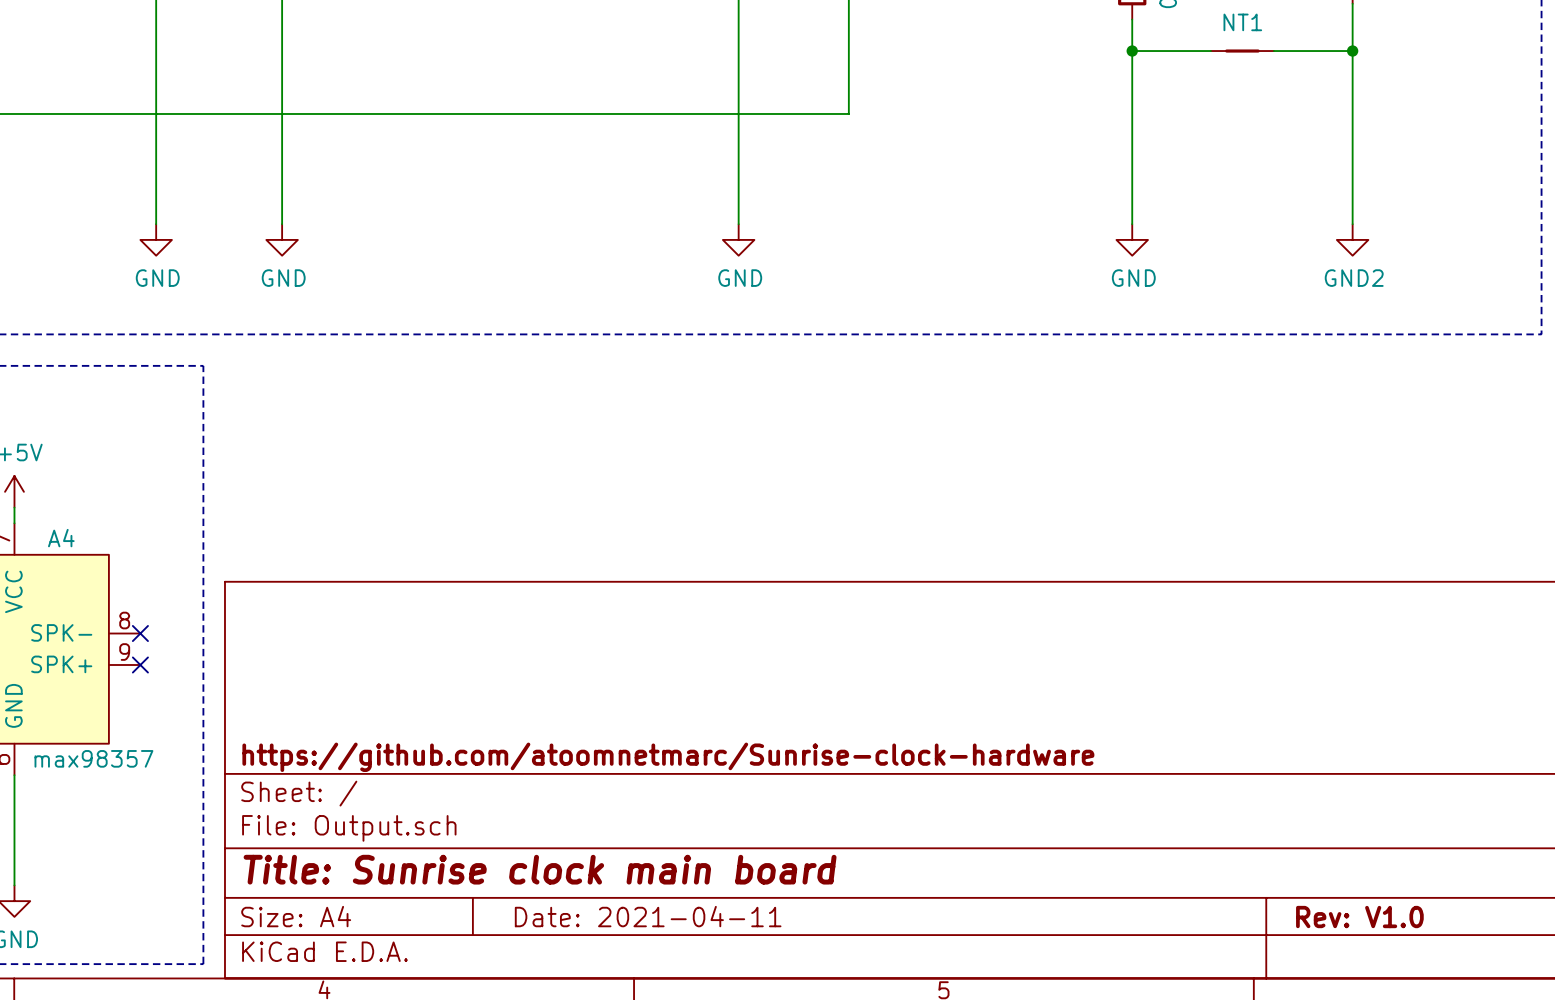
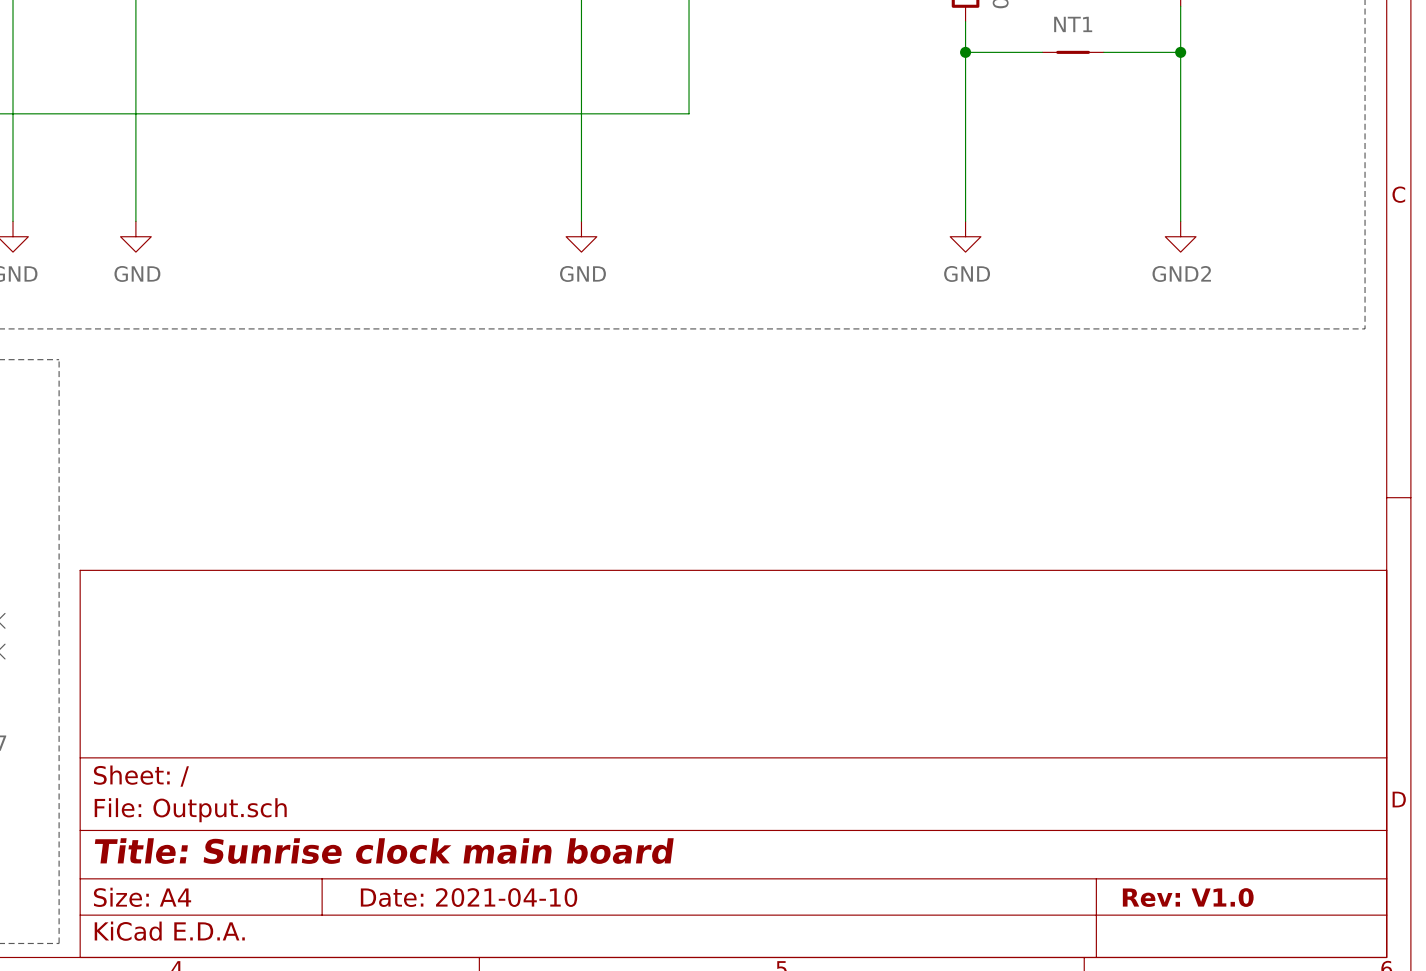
title block: https://github.com/atoomnetmarc/Sunrise-clock-hardware (668, 757) -> none
title block: Date: 2021-04-11 (648, 916) -> Date: 2021-04-10 (469, 897)

